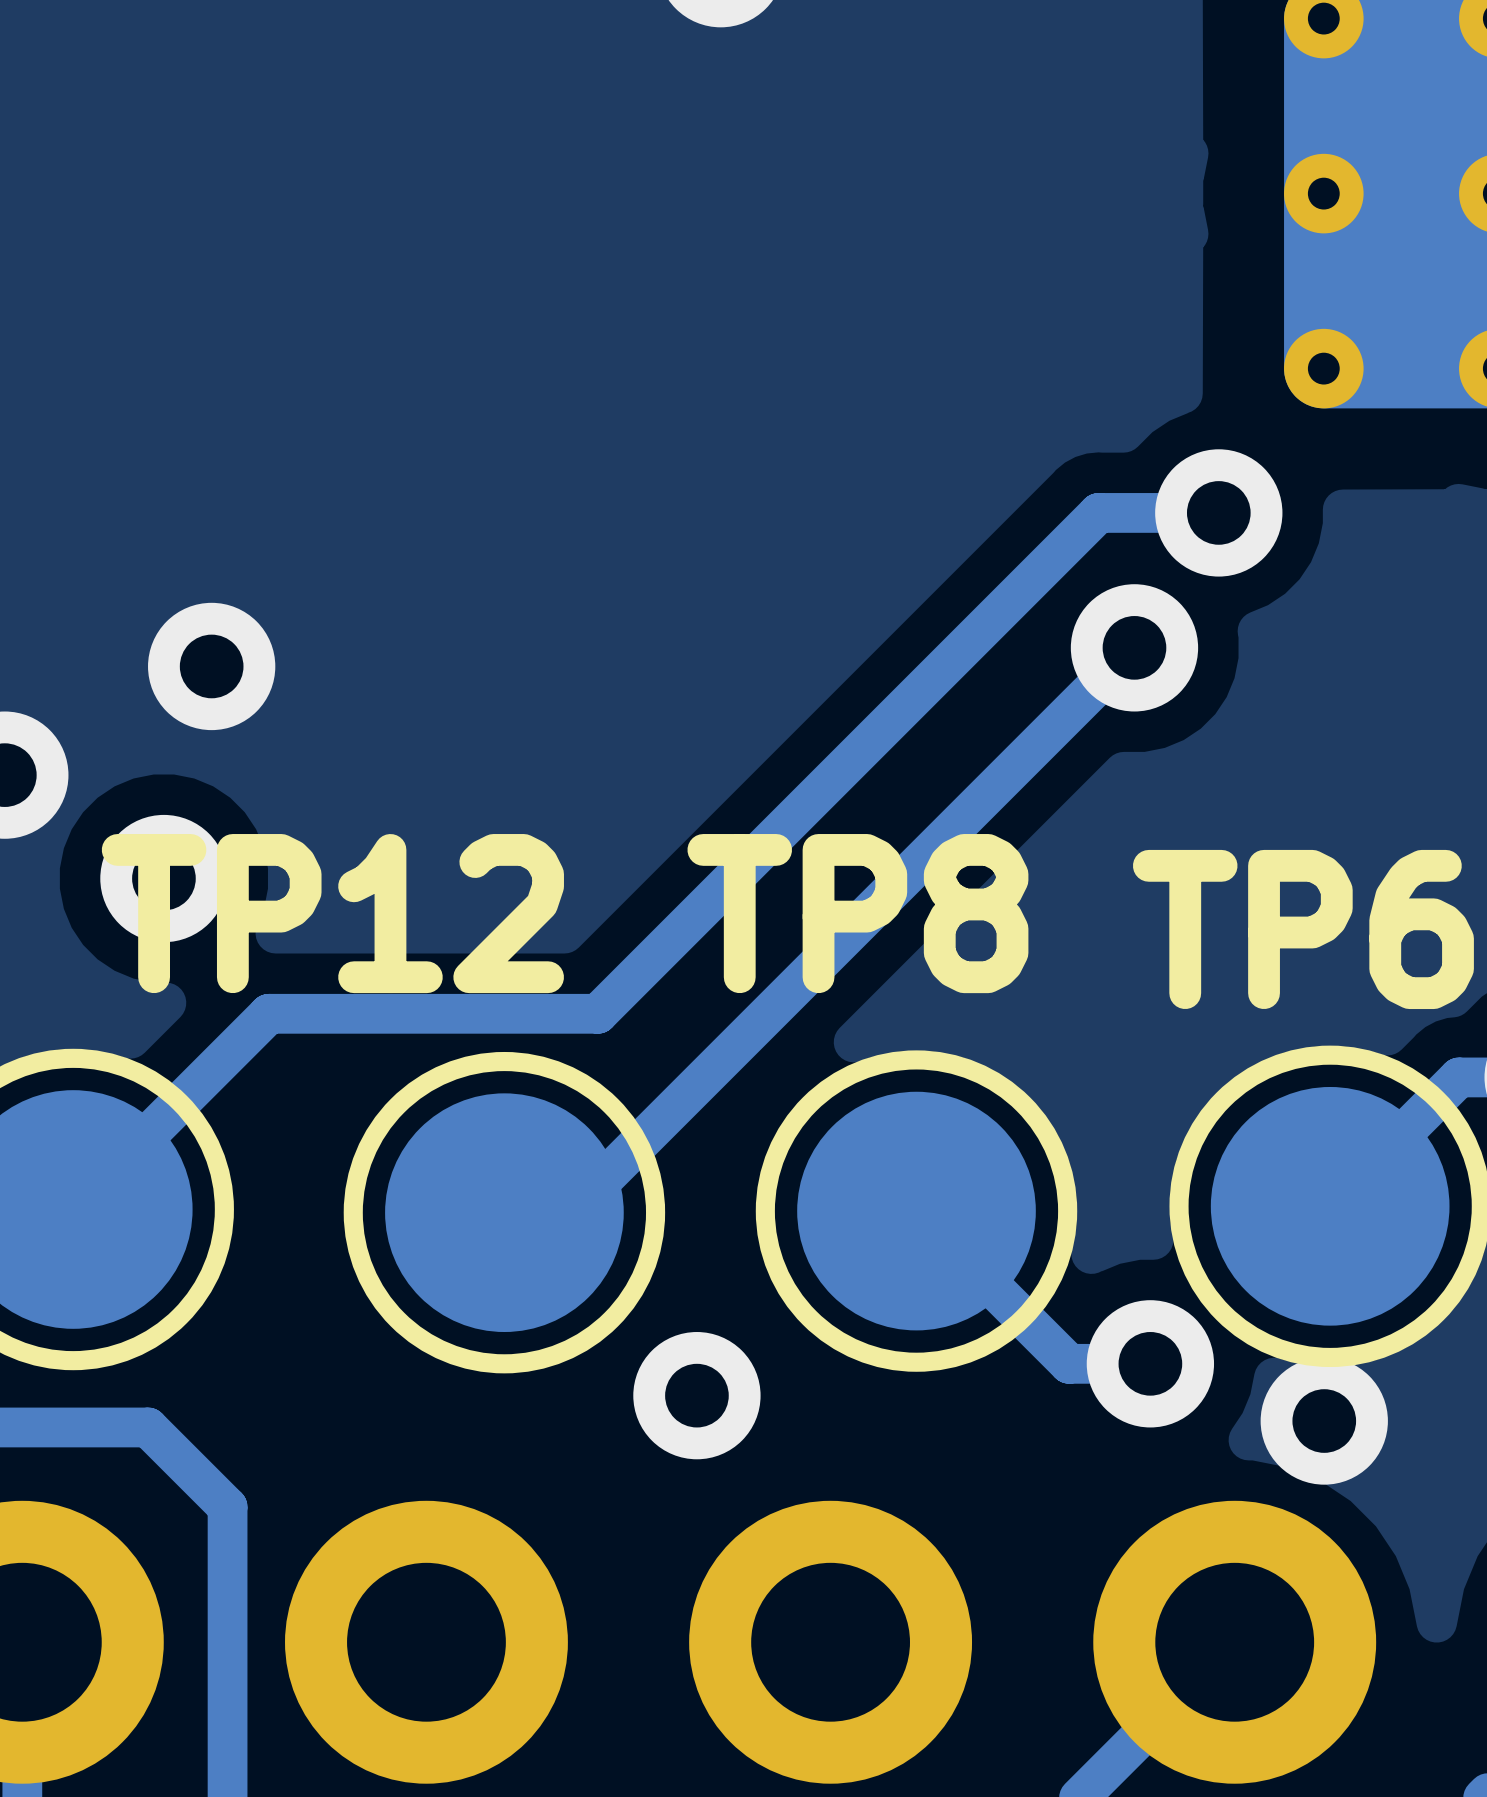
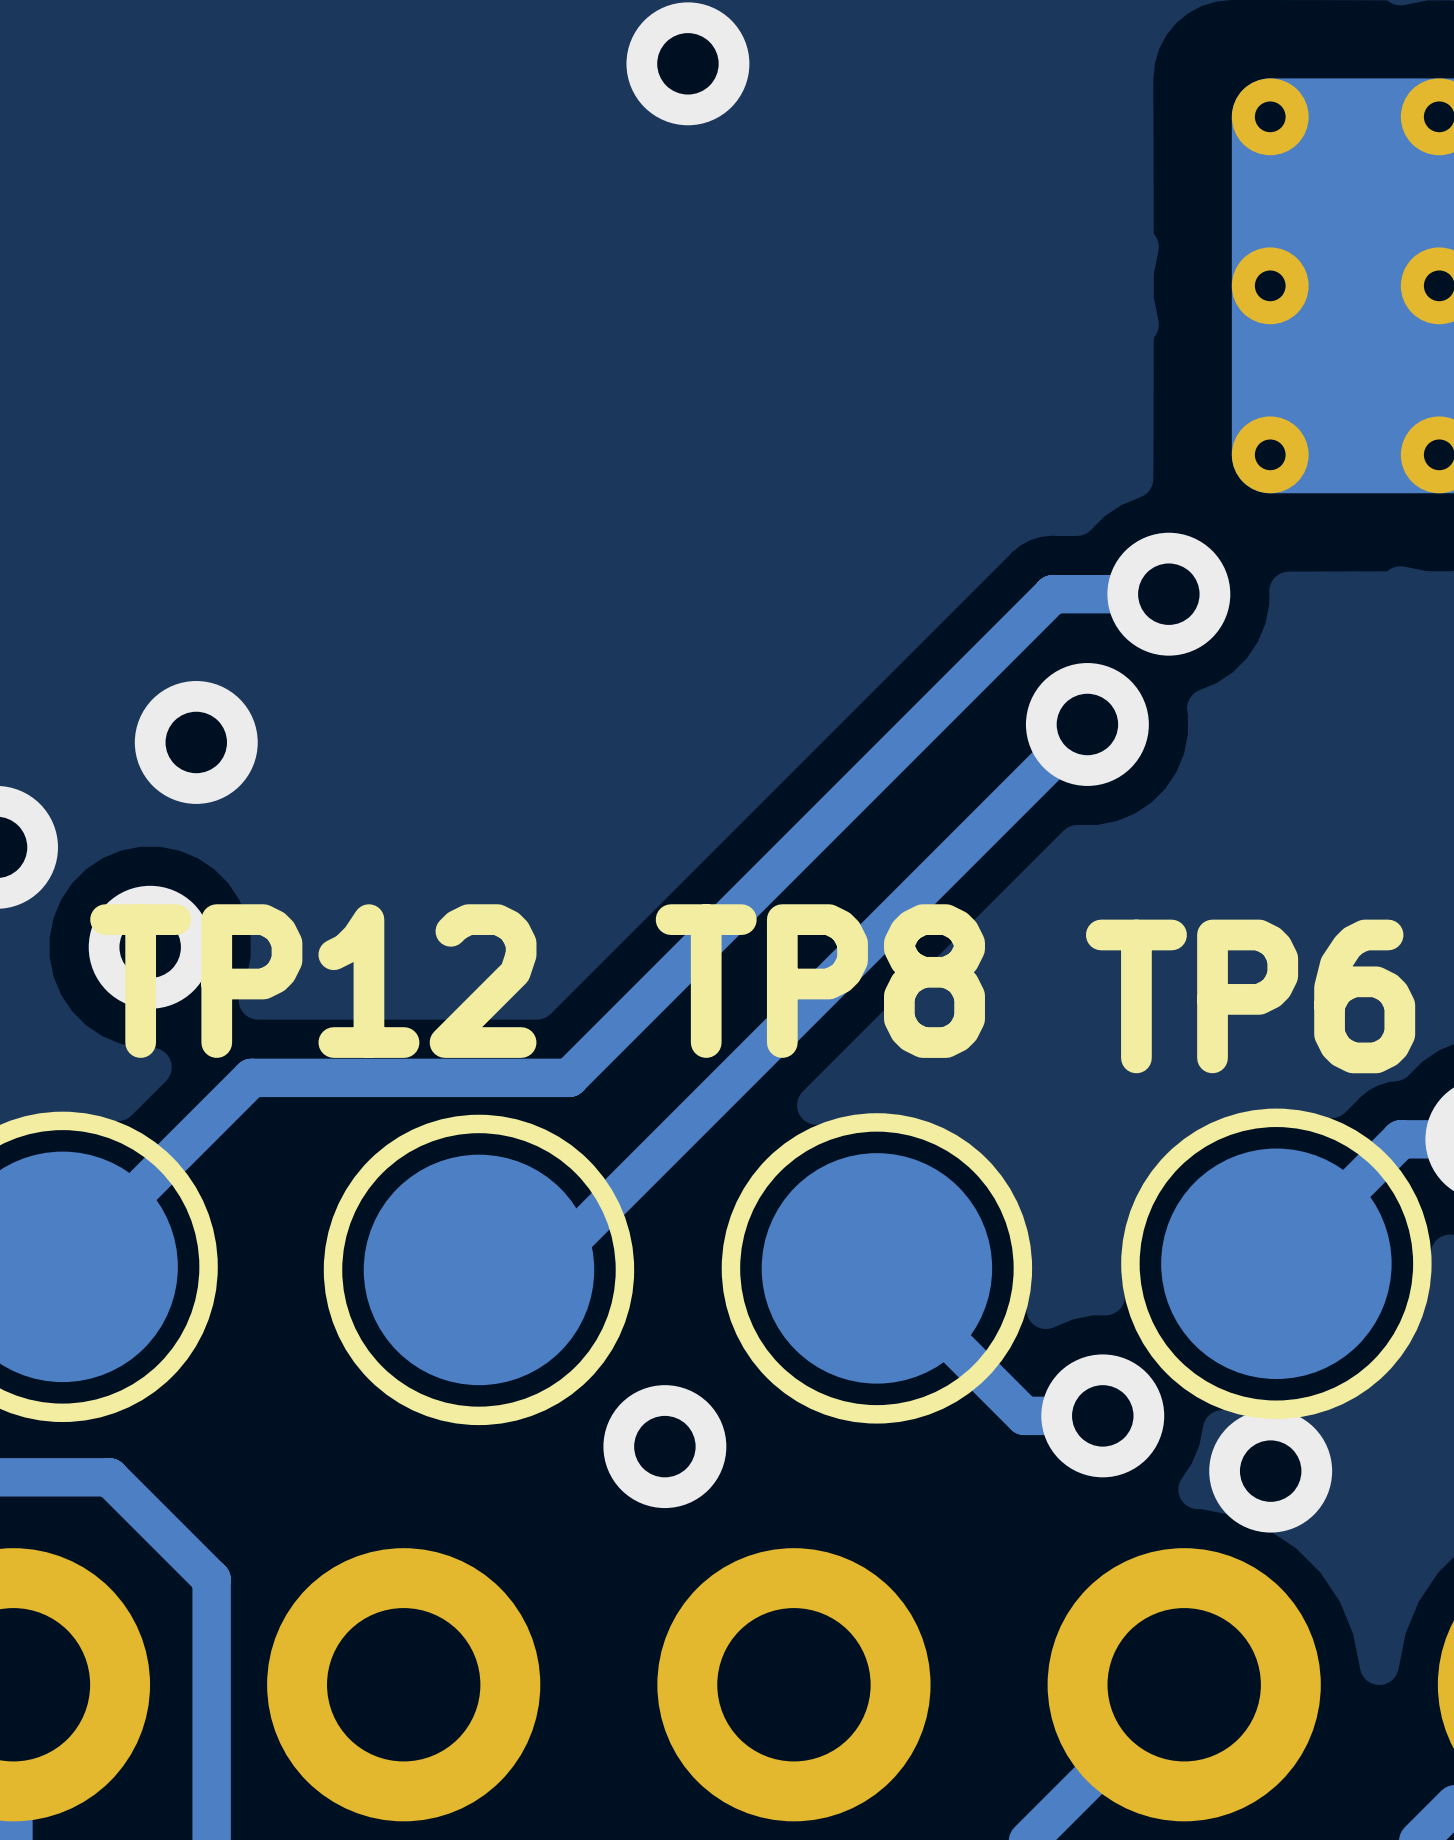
track: (121, 1427) (148, 1427) (227, 1507) (227, 1533) -> (109, 1477) (211, 1579)

